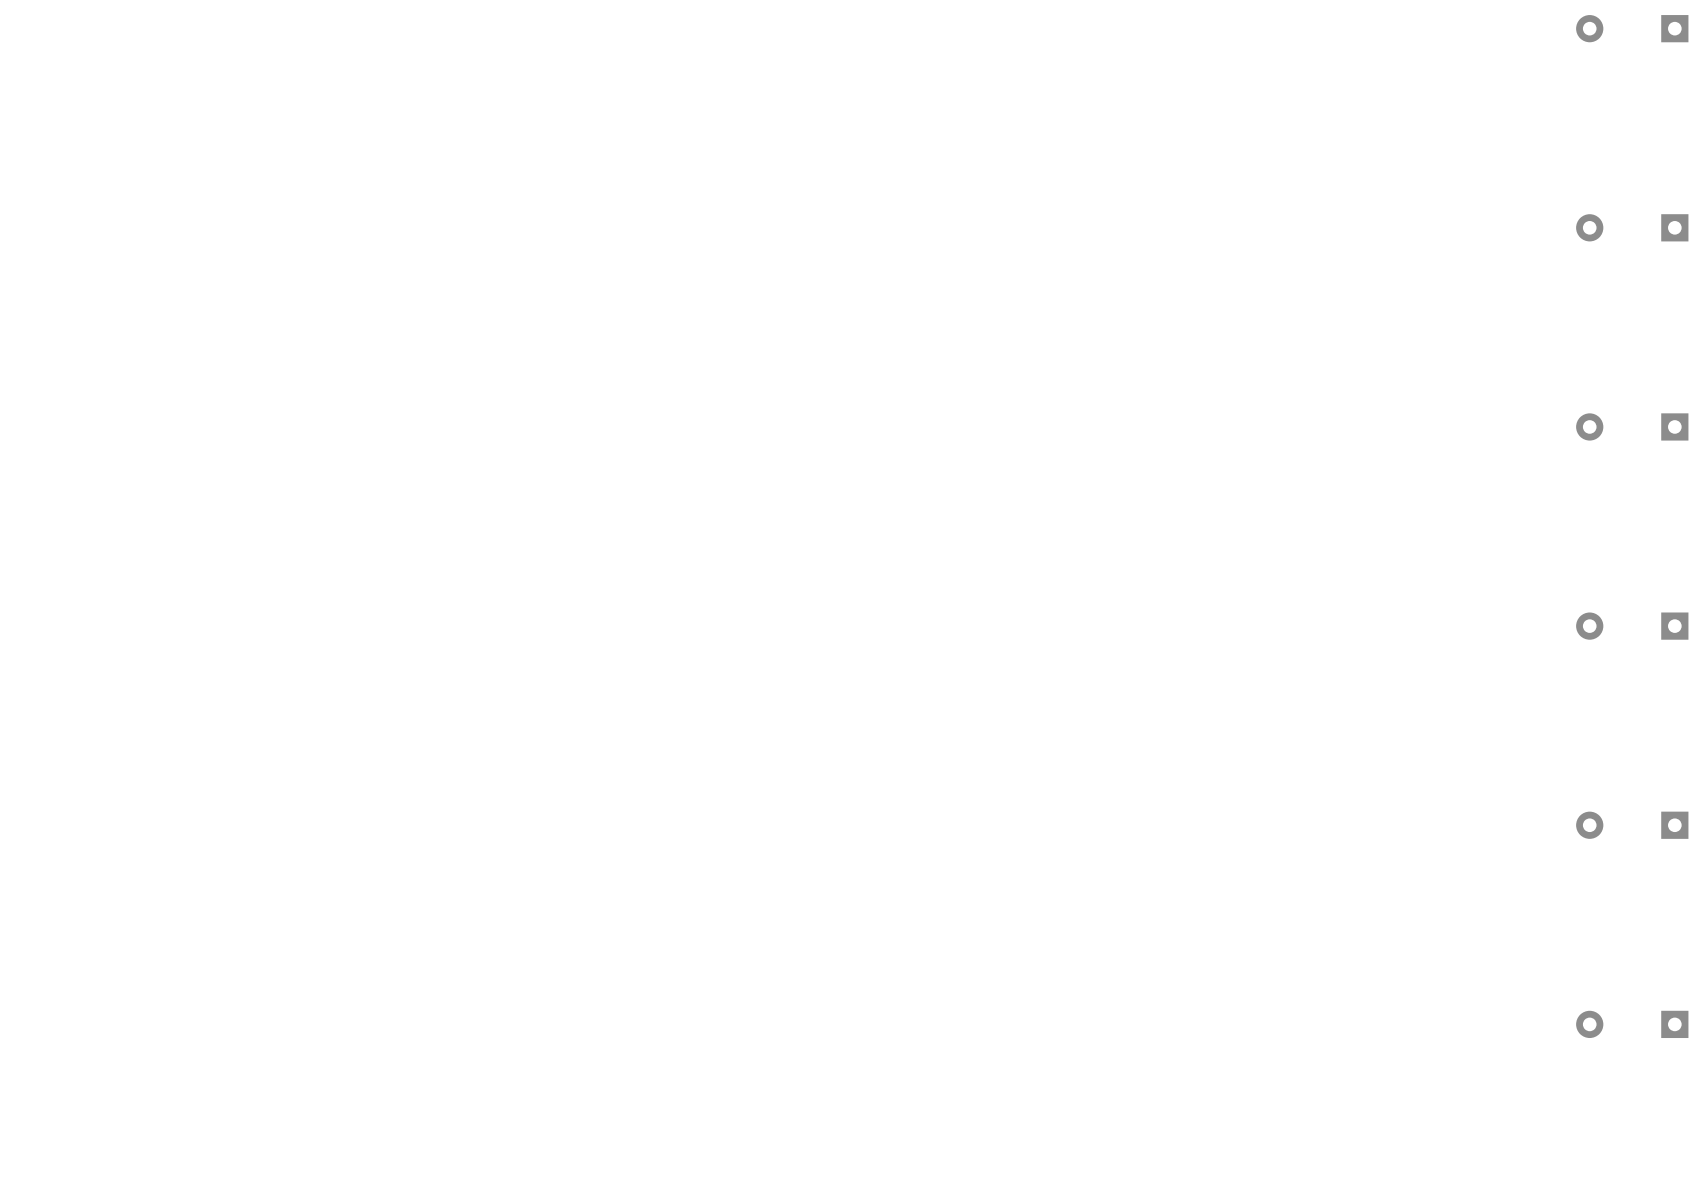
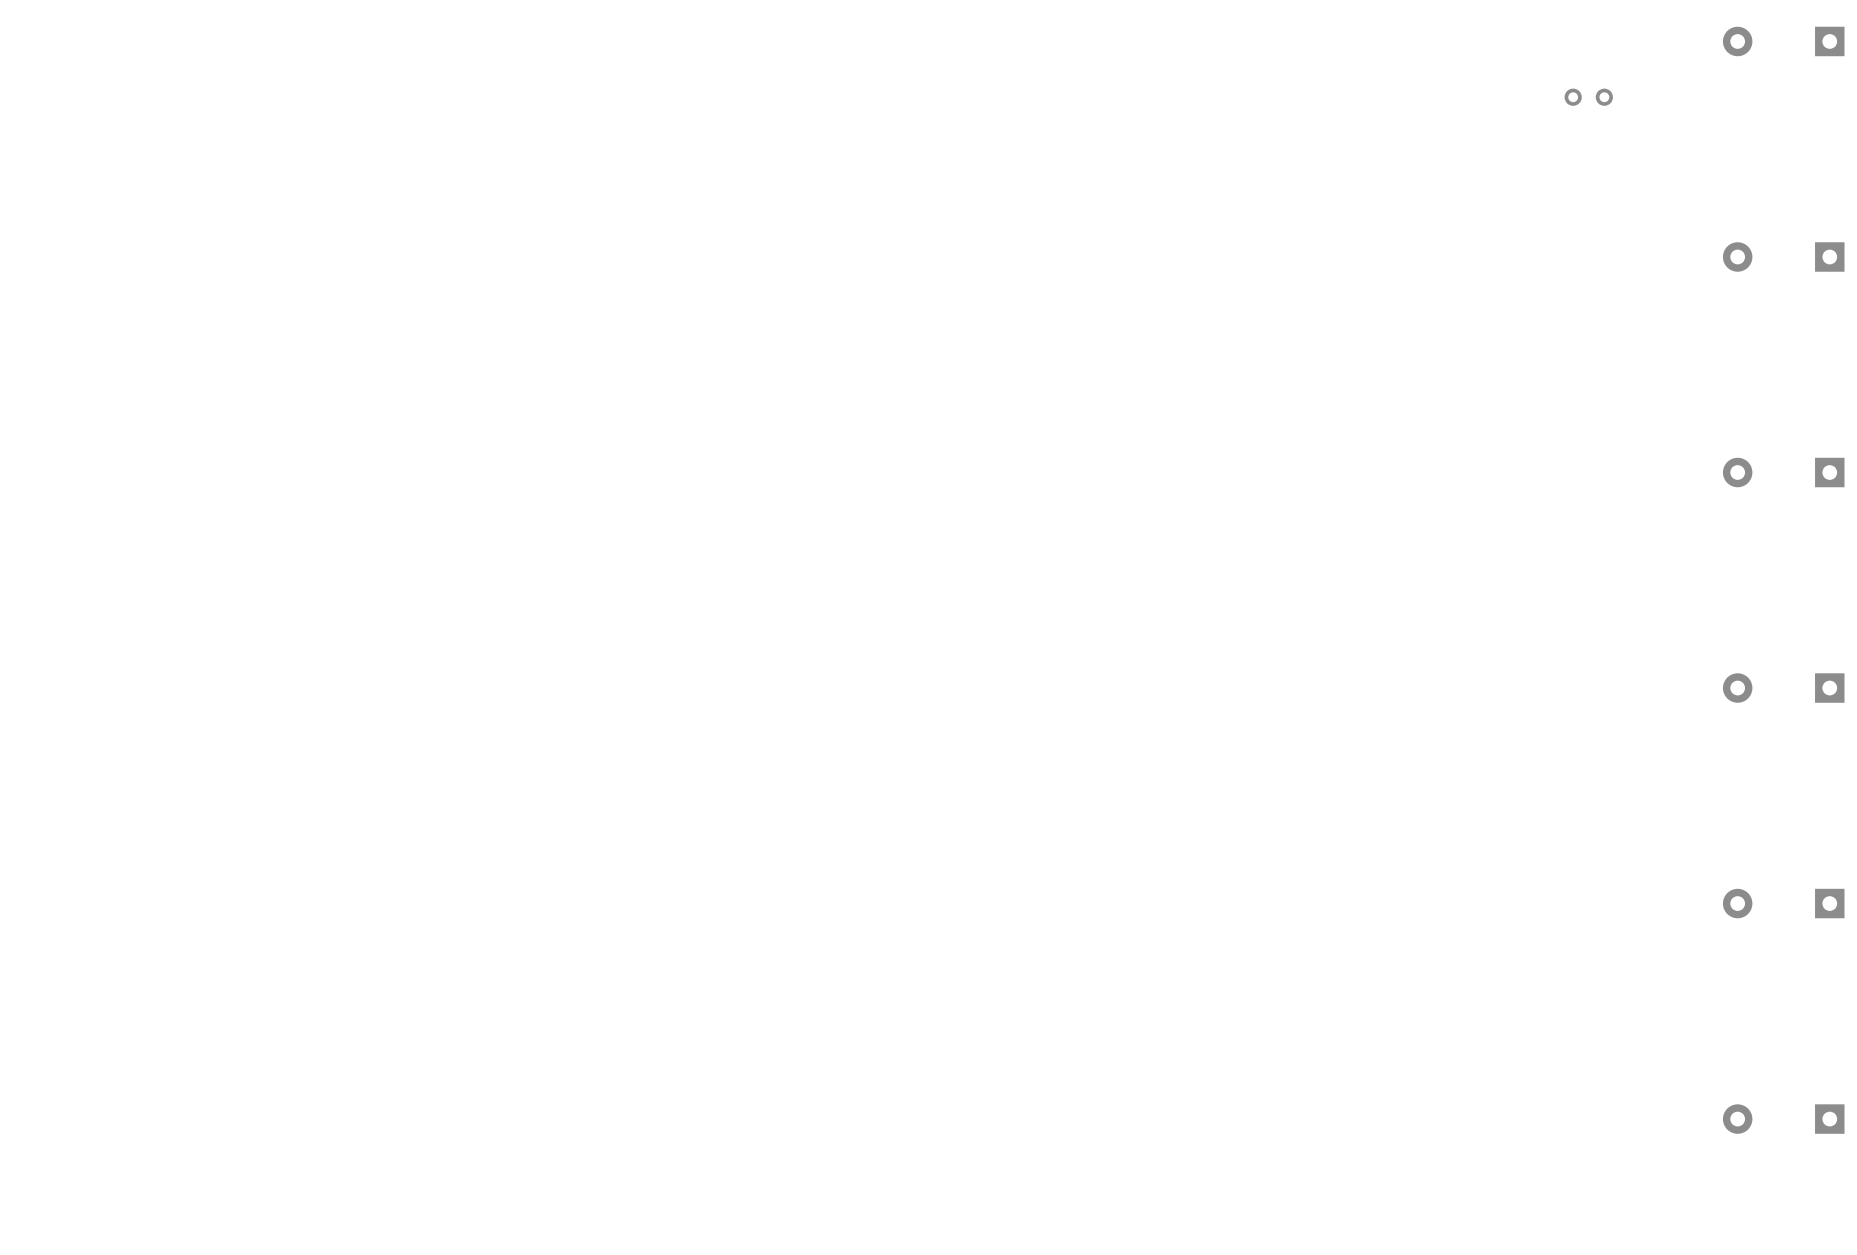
part: none -> (1588, 97)

